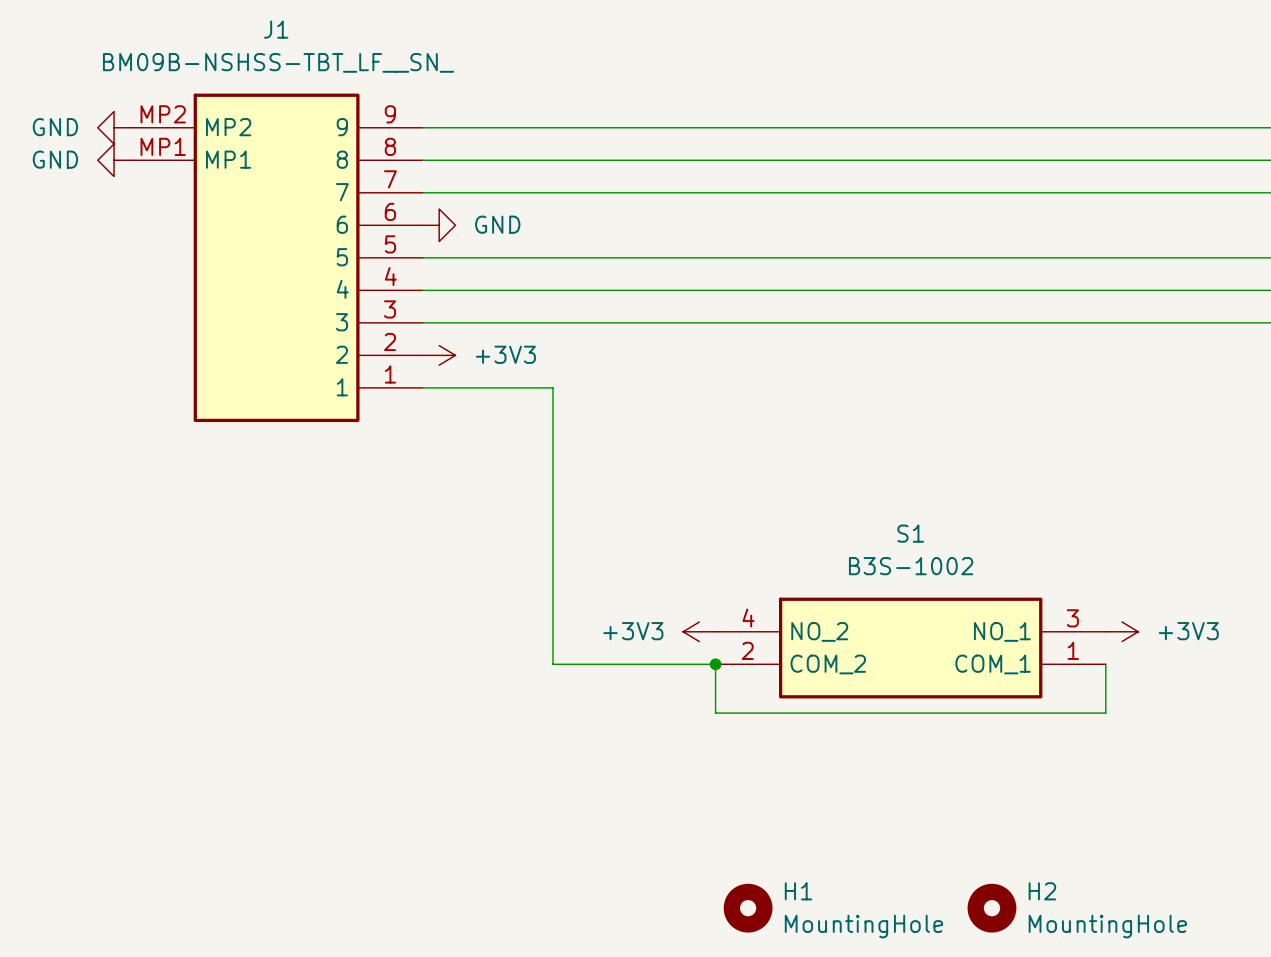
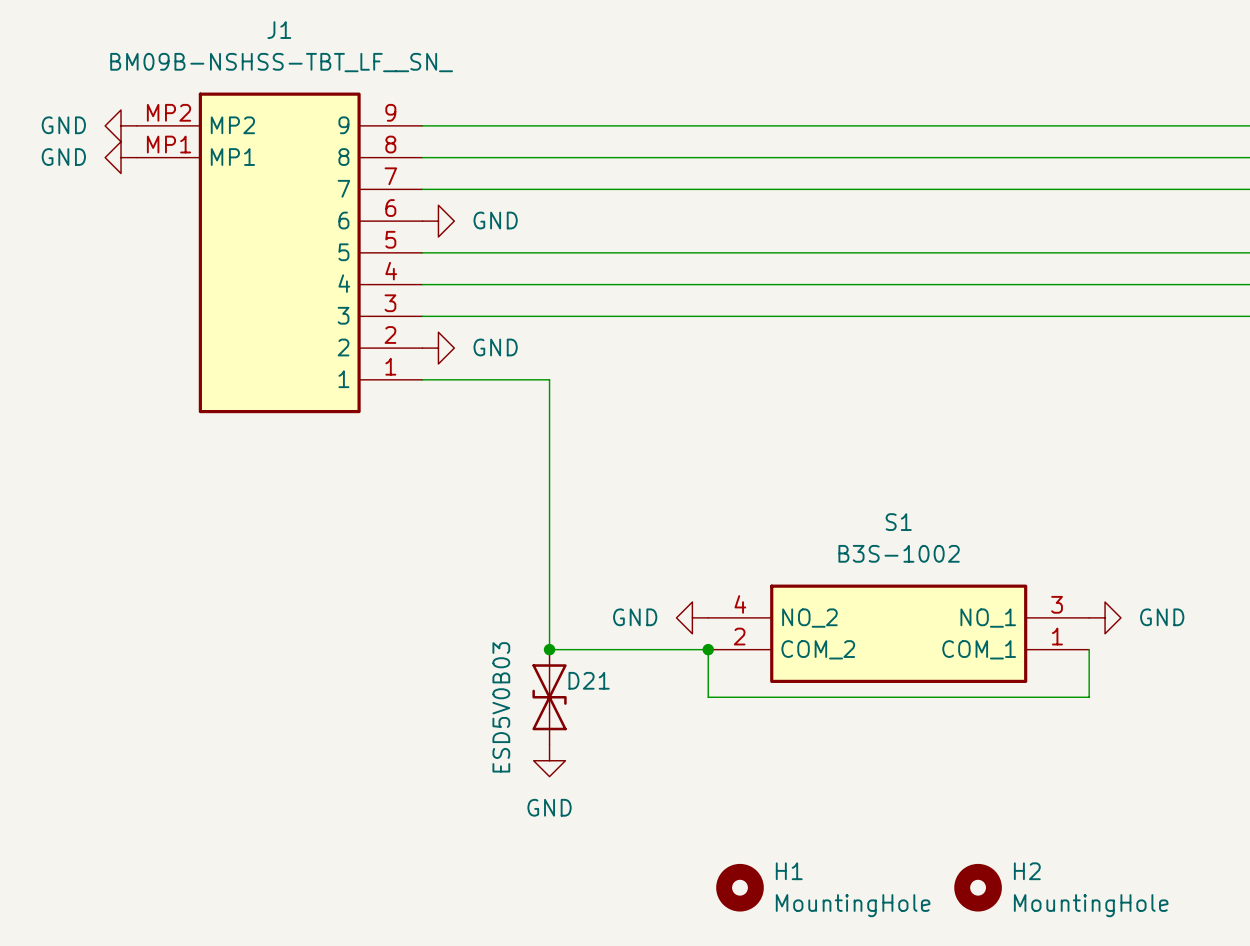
power symbol: +3V3 (439, 355) -> GND (438, 348)
power symbol: +3V3 (699, 631) -> GND (692, 617)
power symbol: +3V3 (1122, 631) -> GND (1105, 617)
junction: none -> (549, 649)
D21: none -> ESD5V0B03 (549, 697)
power symbol: none -> GND (549, 760)

